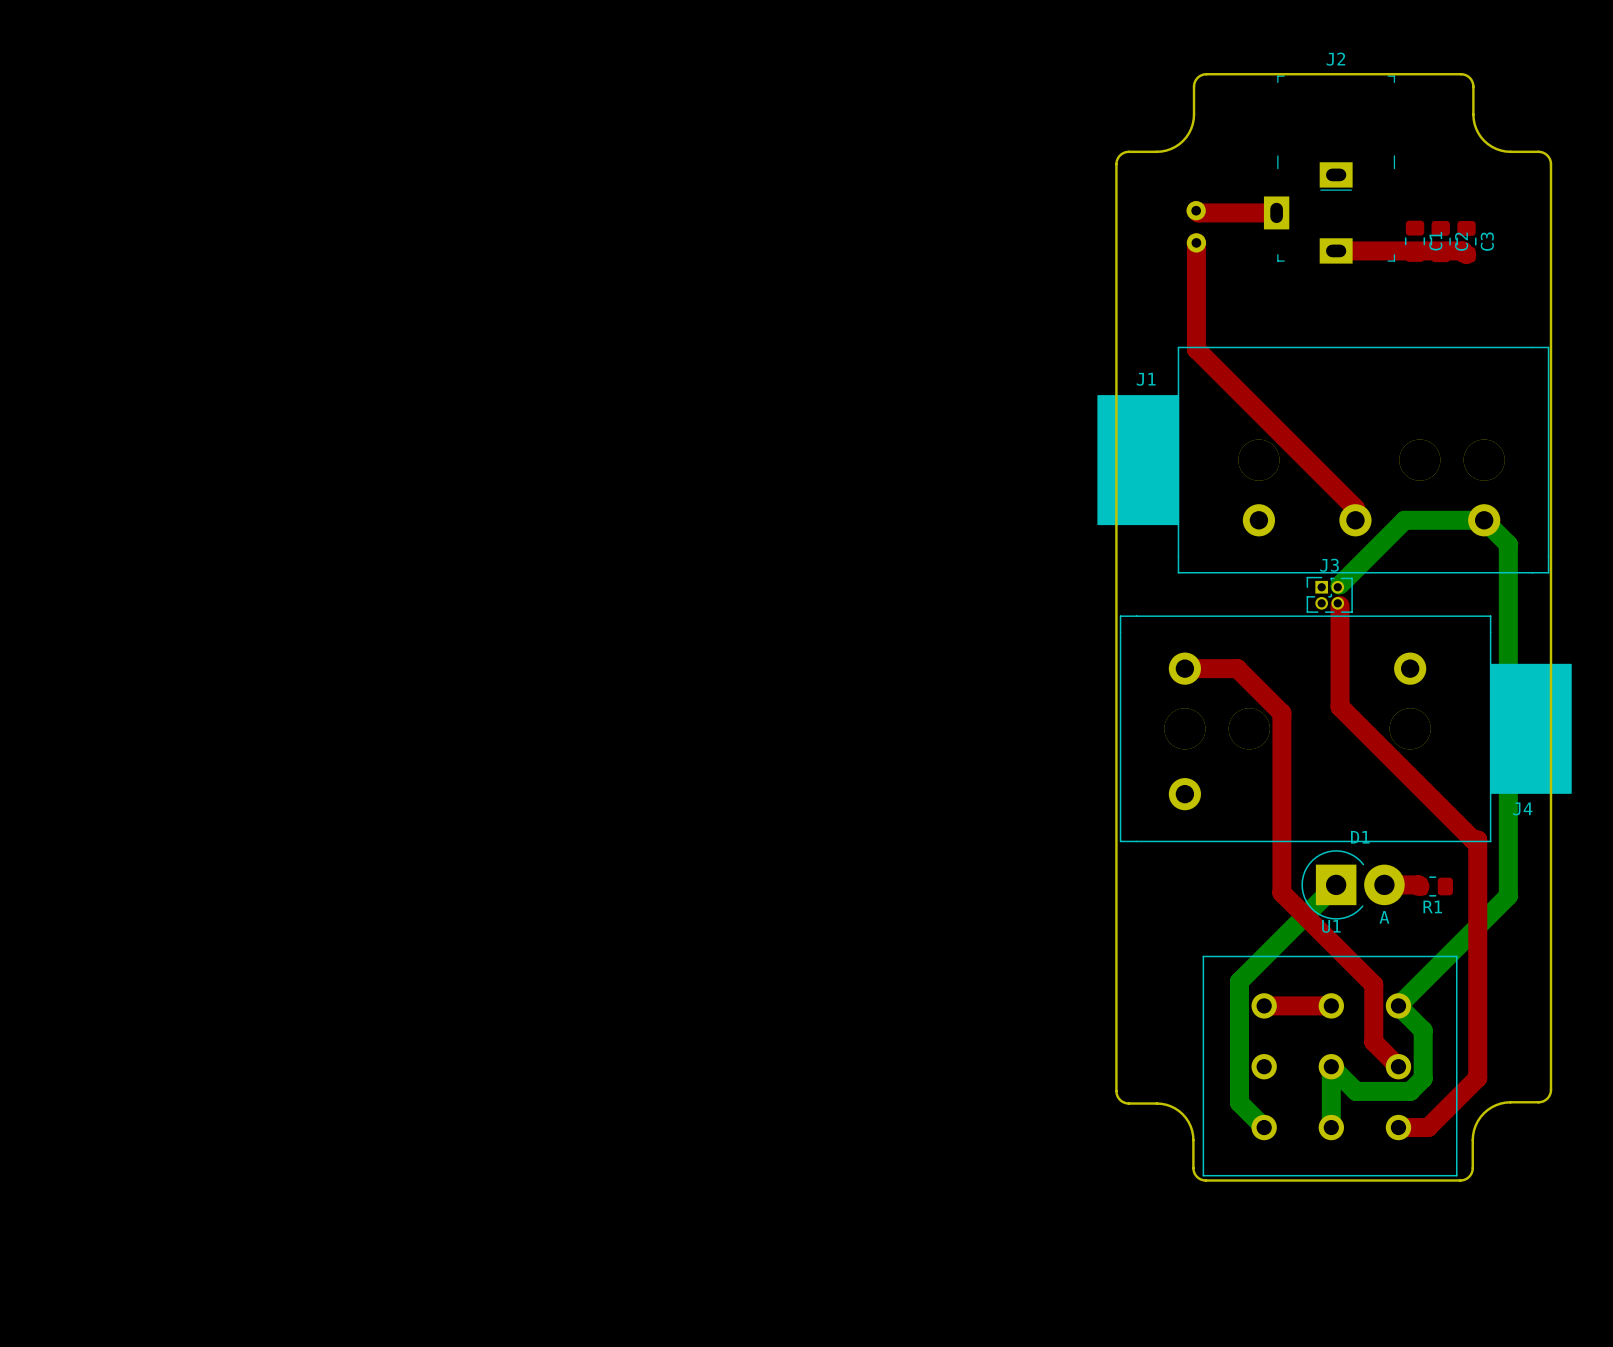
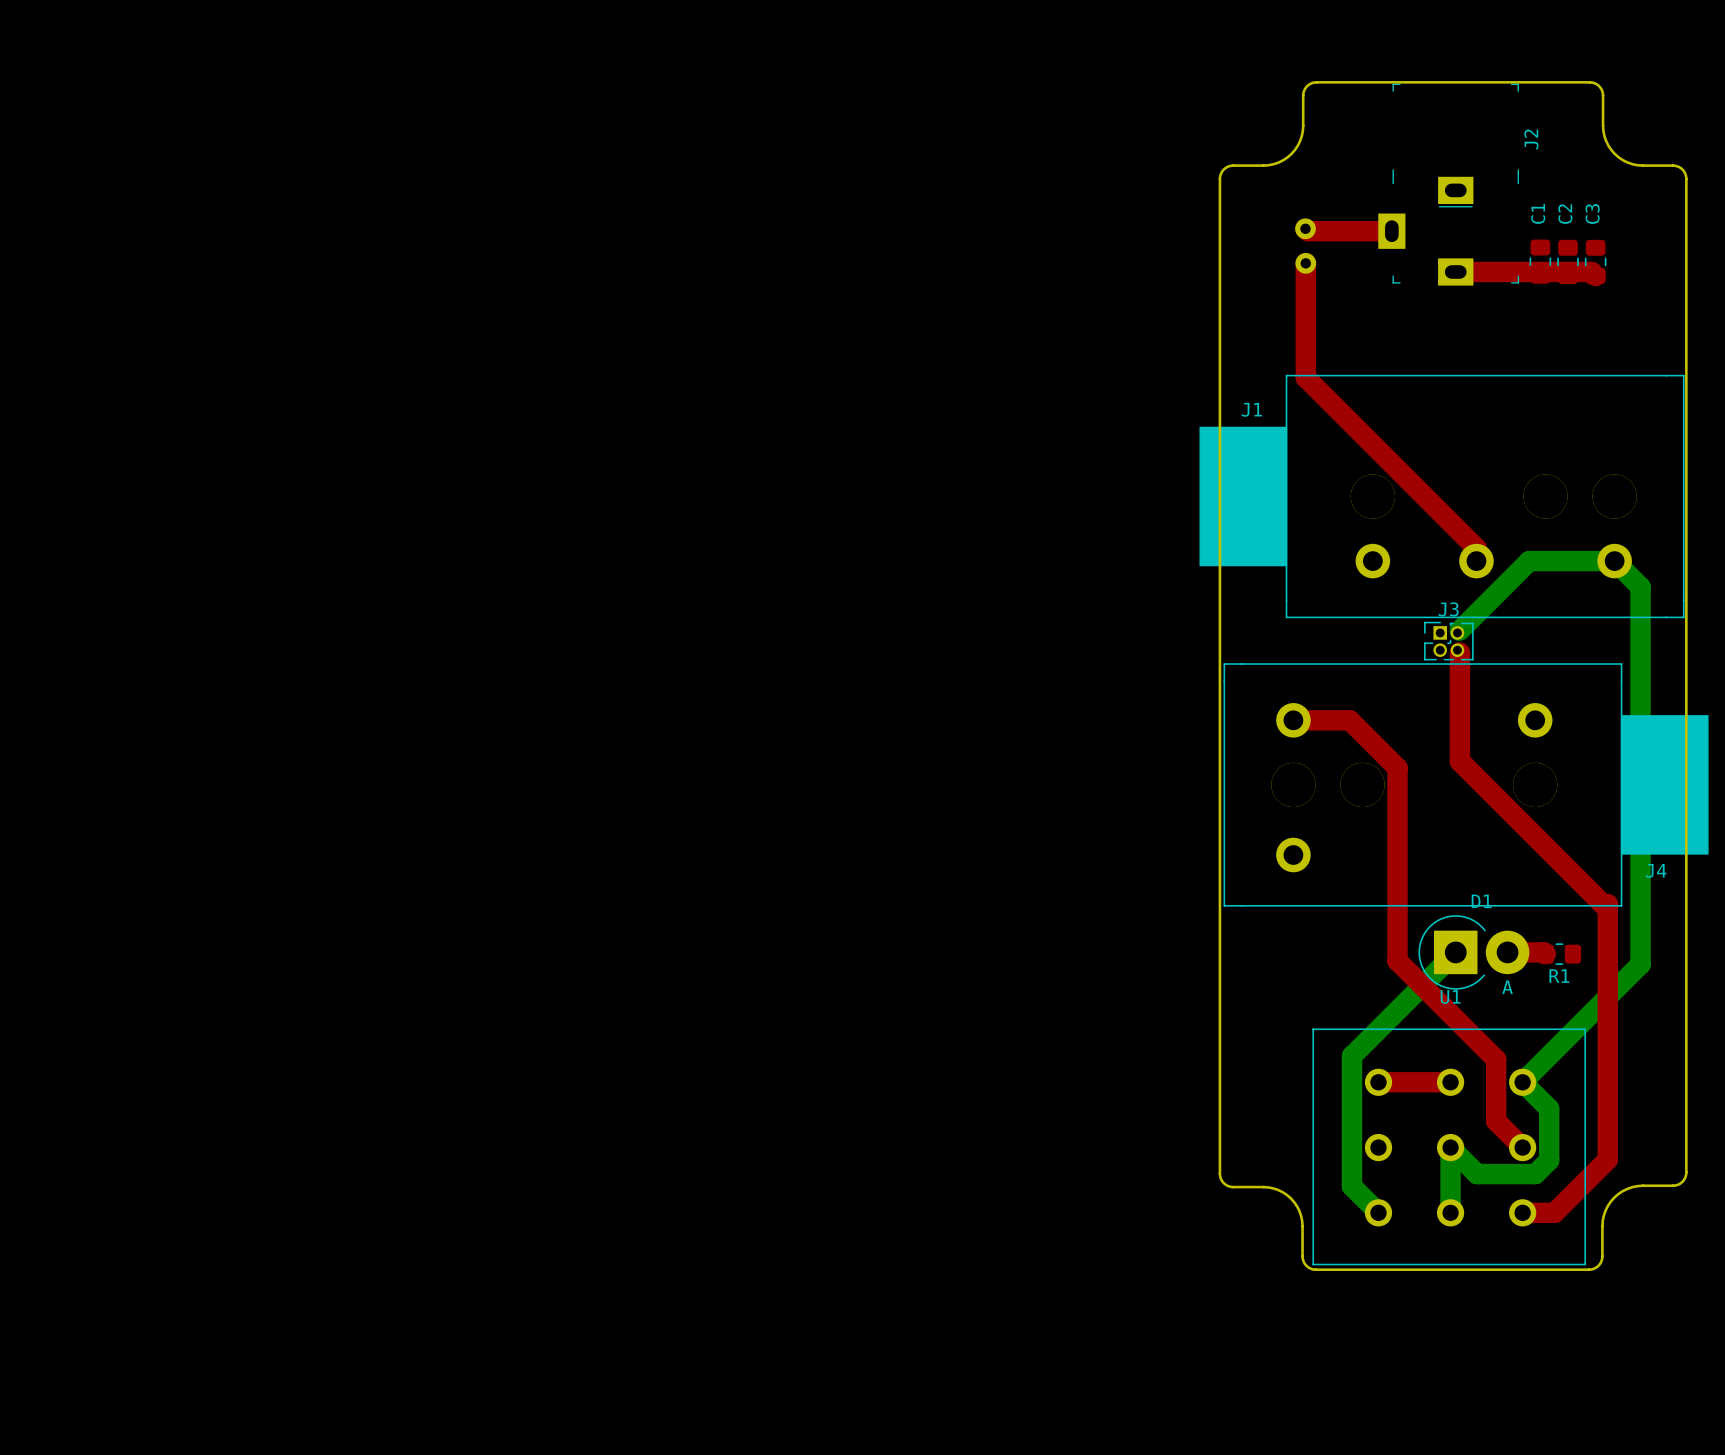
J2 name rotation: 0° (1335, 59) -> 90° counterclockwise (1531, 139)
J2 name position: J2 (1335, 59) -> J2 (1531, 139)
C1 name position: C1 (1435, 241) -> C1 (1538, 213)
C2 name position: C2 (1461, 241) -> C2 (1565, 214)
C3 name position: C3 (1487, 241) -> C3 (1592, 213)

